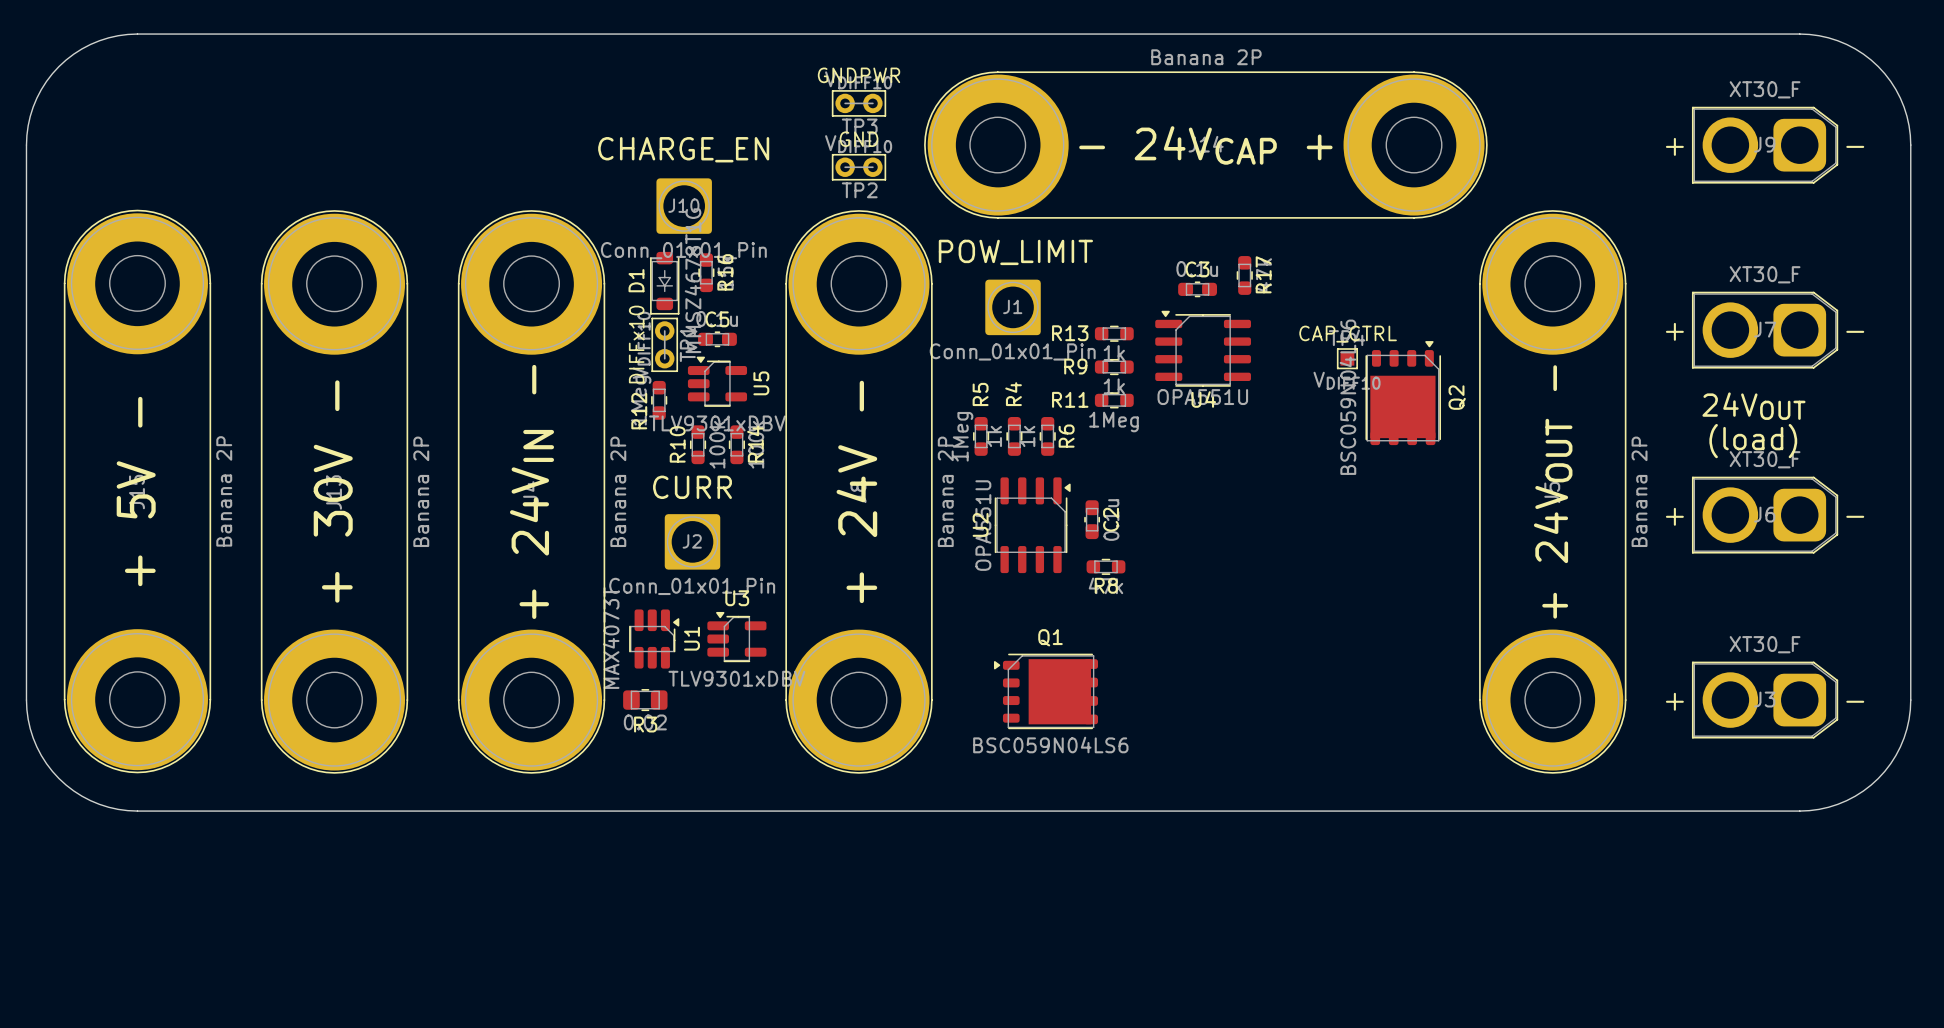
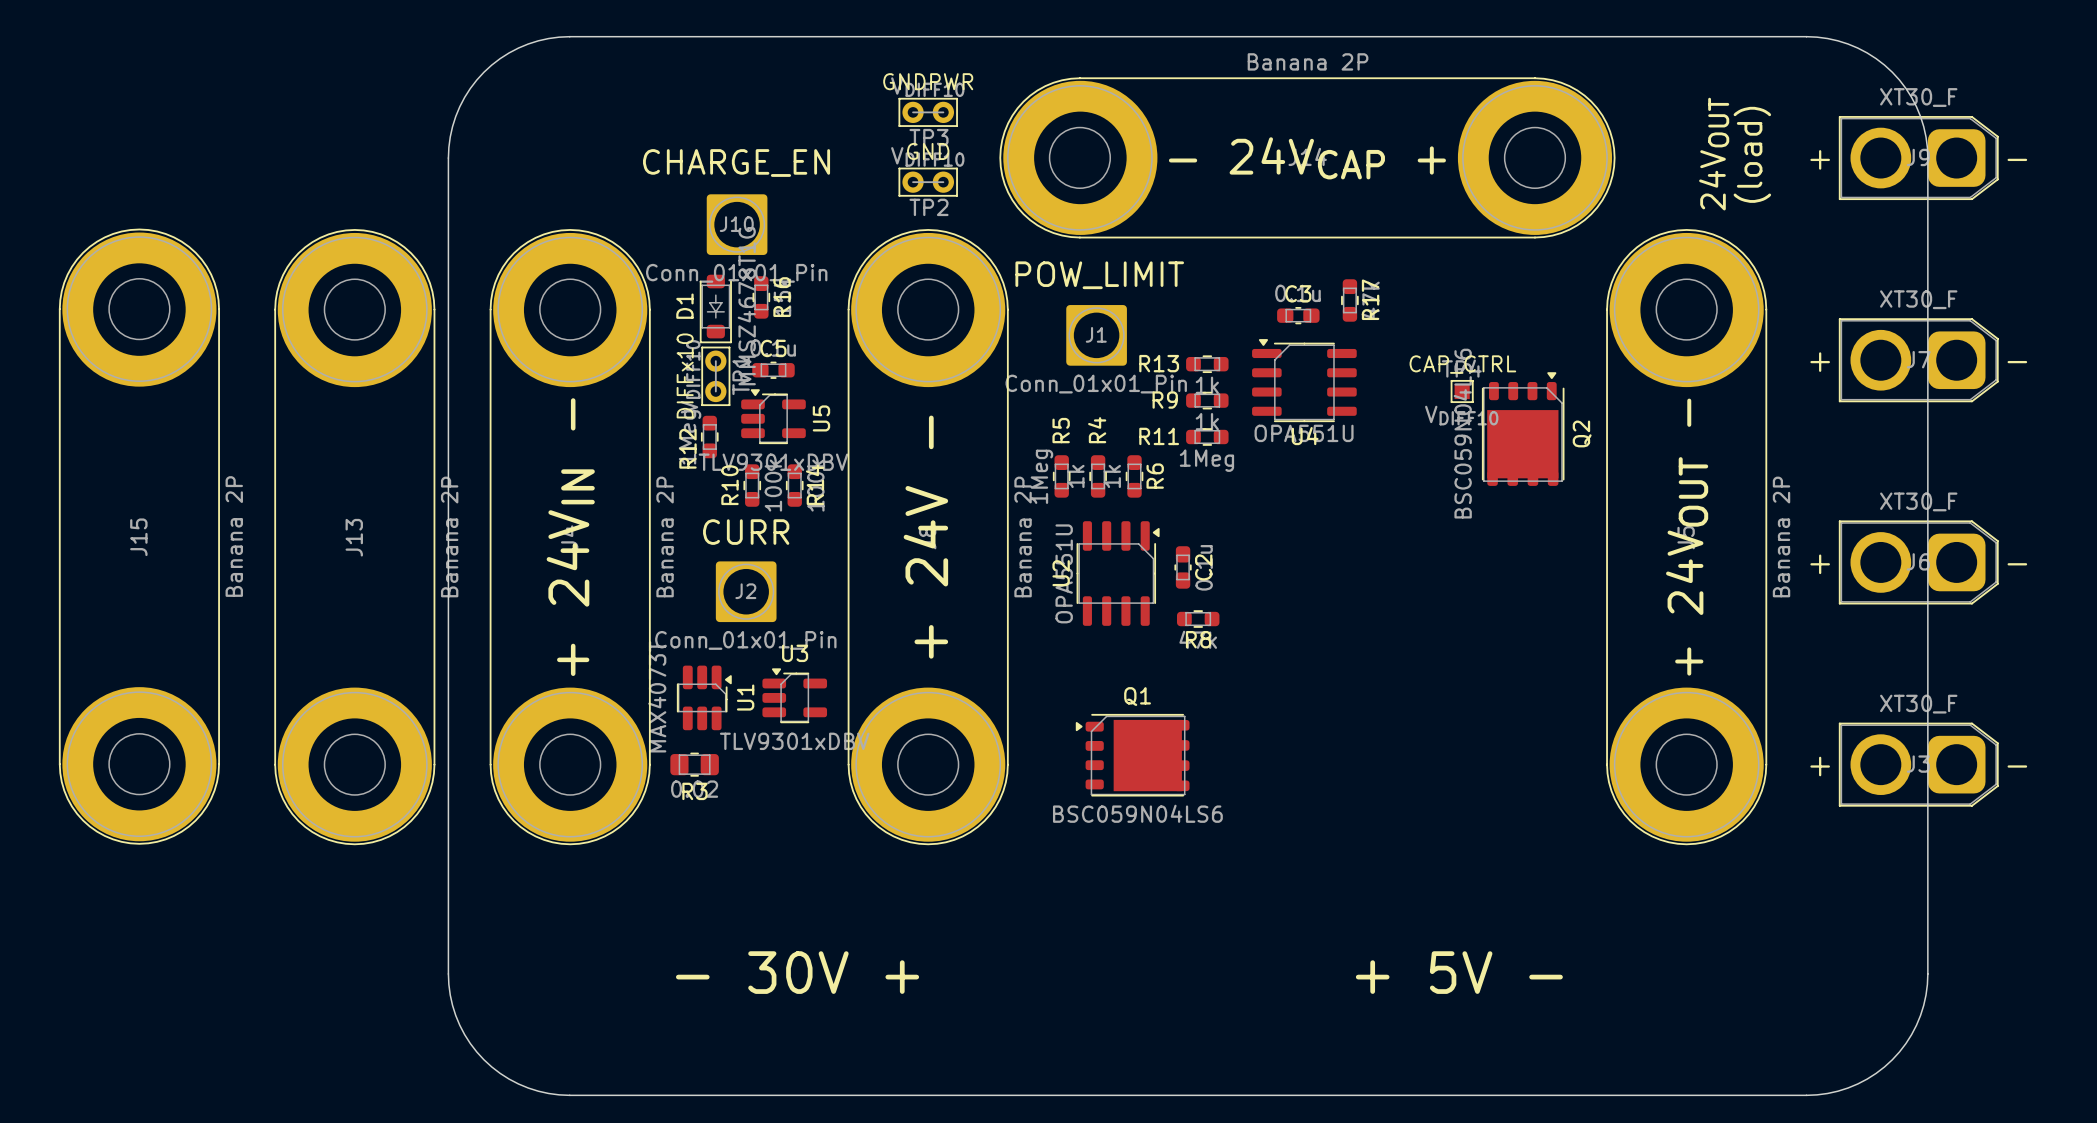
board edge: (137, 34) (1799, 34) (1819, 35) (1837, 40) (1863, 54) (1884, 73) (1895, 89) (1904, 107) (1910, 135) (1910, 700) (1909, 719) (1904, 738) (1895, 755) (1884, 771) (1863, 790) (1846, 800) (1828, 807) (1799, 811) (137, 811) (118, 809) (99, 804) (73, 790) (58, 778) (46, 763) (33, 738) (26, 709) (26, 135) (30, 116) (36, 98) (46, 81) (58, 66) (73, 54) (90, 44) (108, 37) (137, 34) -> (569, 36) (548, 38) (528, 44) (509, 52) (491, 65) (476, 80) (464, 97) (452, 126) (448, 147) (448, 984) (455, 1015) (464, 1034) (483, 1059) (500, 1073) (528, 1088) (548, 1093) (569, 1095) (1806, 1095) (1827, 1093) (1857, 1083) (1884, 1066) (1905, 1043) (1920, 1015) (1926, 995) (1927, 973) (1927, 158) (1926, 136) (1916, 106) (1899, 80) (1876, 58) (1857, 48) (1837, 40) (1806, 36) (569, 36)
text rotation: 0° (1753, 406) -> 90° counterclockwise (1714, 154)
text position: 24VOUT (1753, 406) -> 24VOUT (1714, 154)
text rotation: 0° (1753, 441) -> 90° counterclockwise (1752, 154)
text position: (load) (1753, 441) -> (load) (1752, 154)
text: + 5V - (136, 491) -> none
text: + 30V - (333, 491) -> none
text: none -> - 30V + (797, 972)
text: none -> + 5V - (1459, 972)

